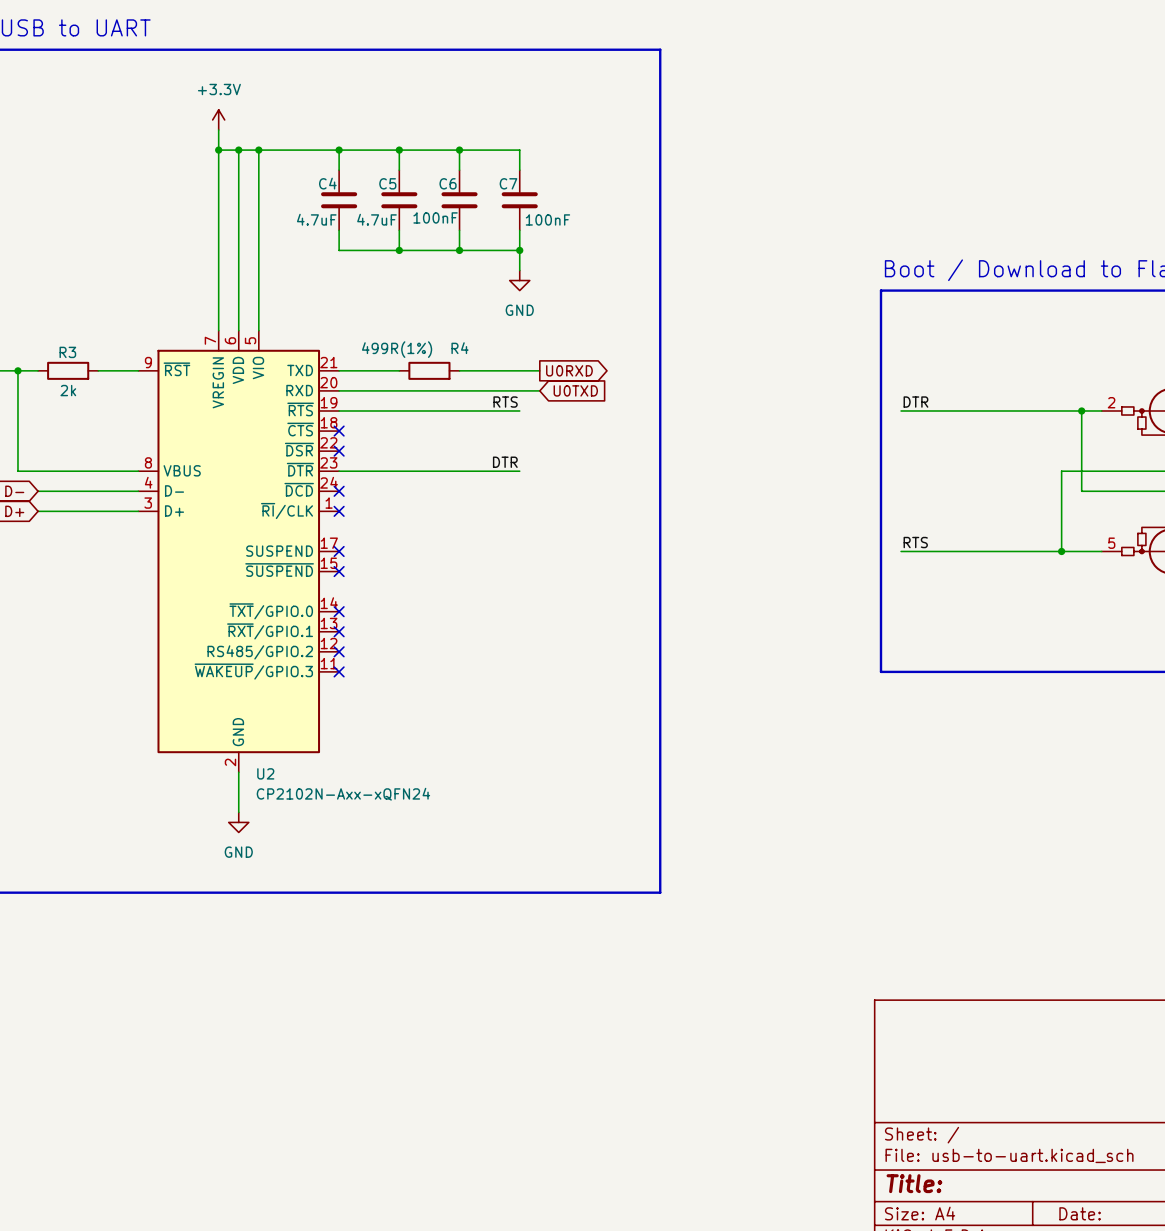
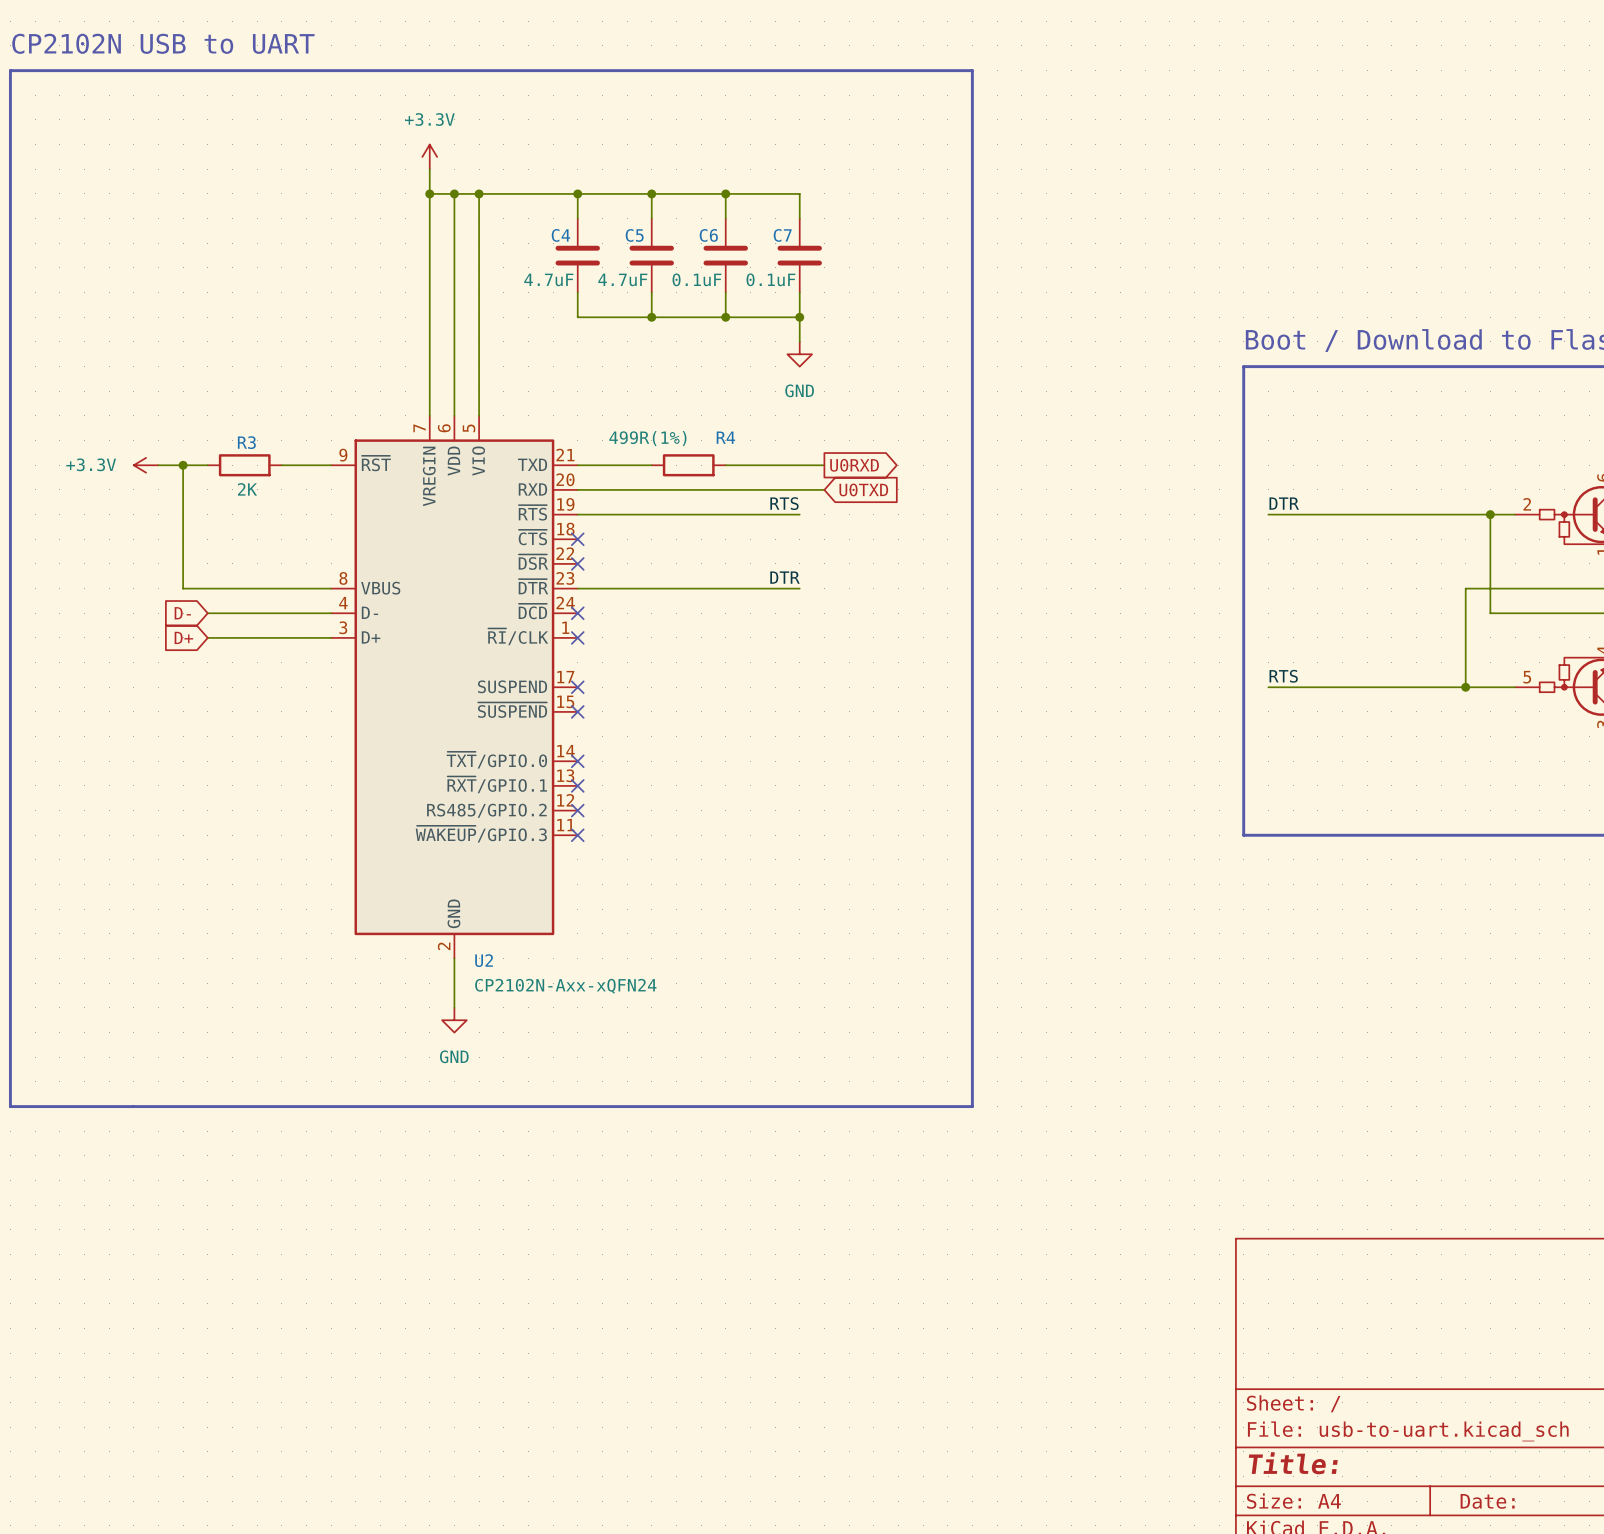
C6 value: 100nF (435, 217) -> 0.1uF (696, 279)
C7 value: 100nF (547, 219) -> 0.1uF (770, 279)
R3 value: 2k (68, 390) -> 2K (247, 489)

